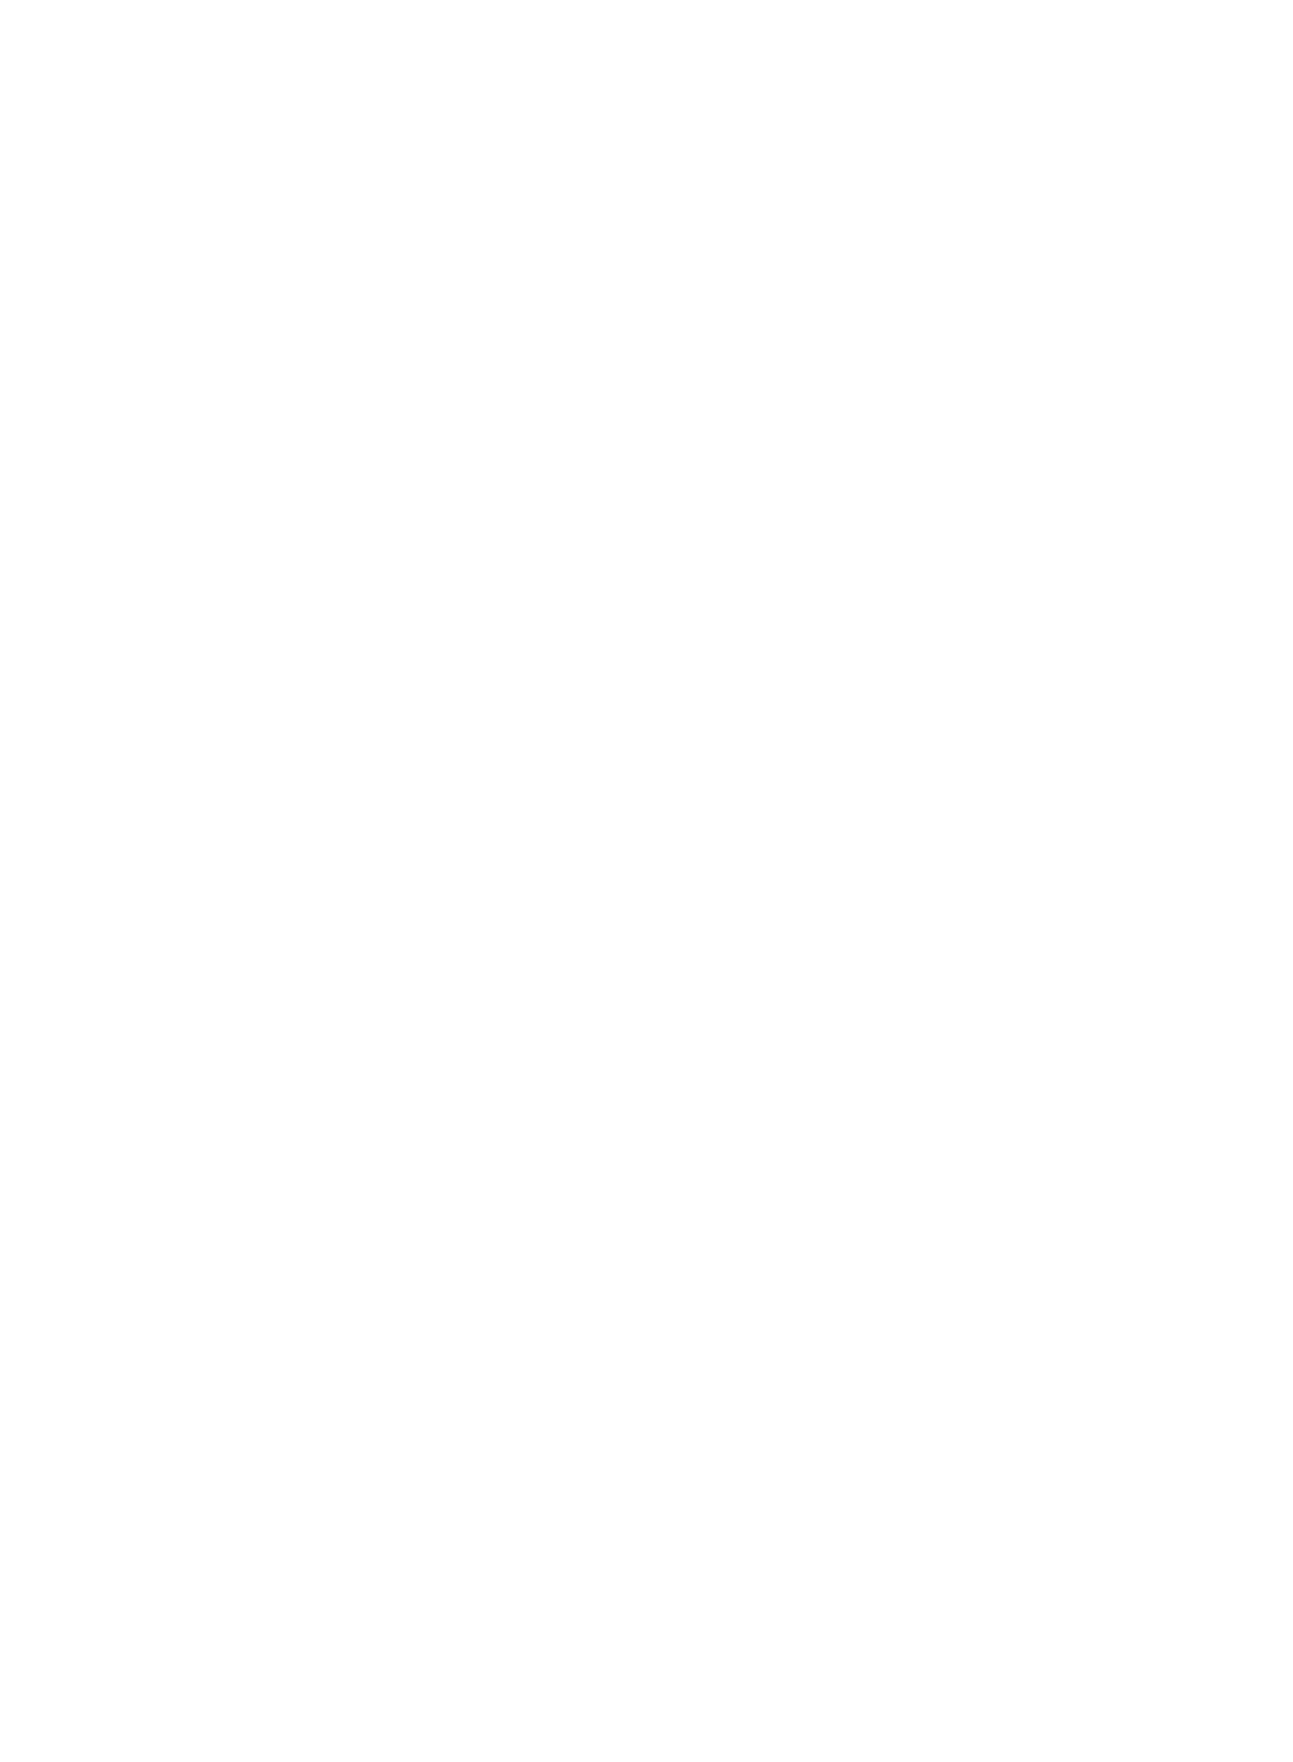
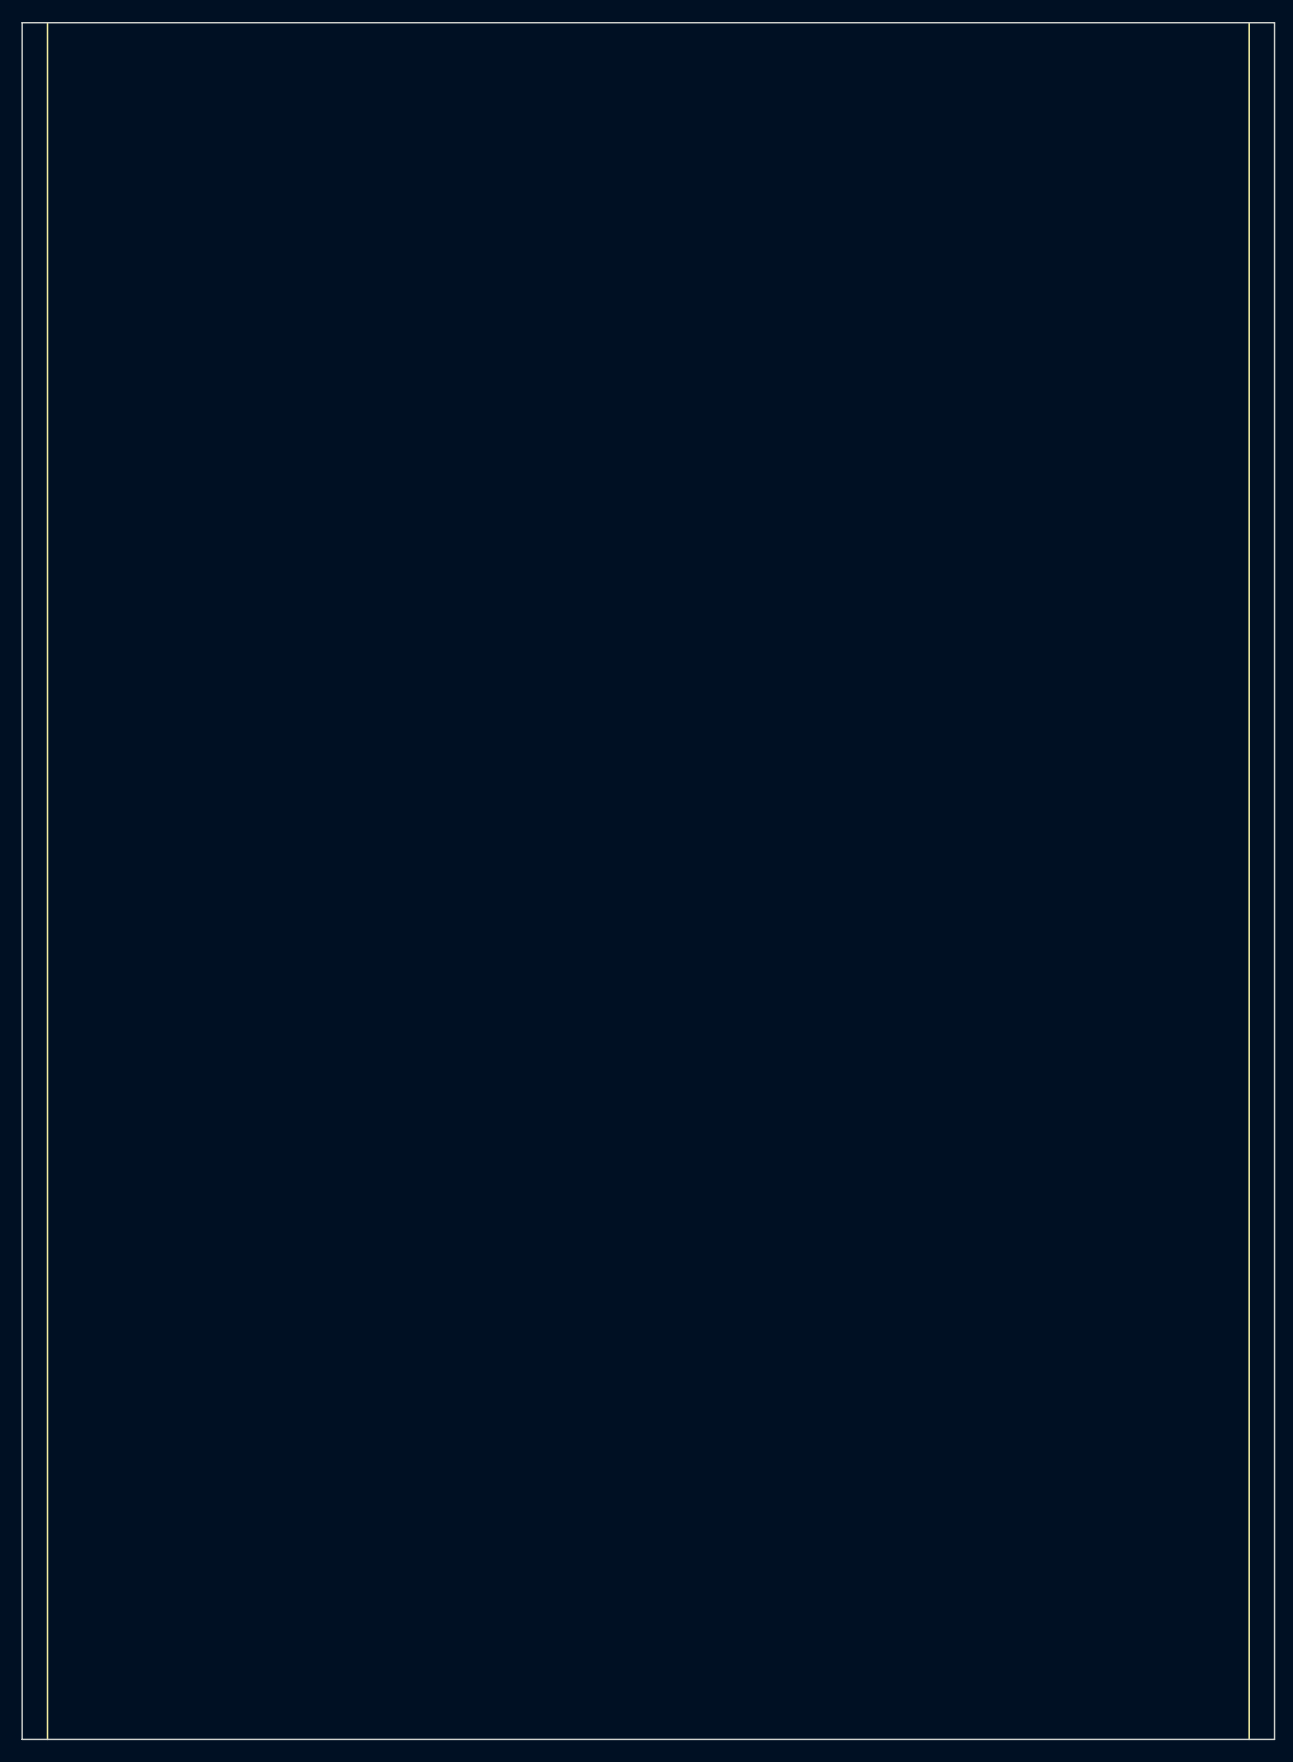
line: none -> (47, 22) (47, 1739)
line: none -> (1249, 22) (1249, 1739)
board edge: none -> (1274, 22) (1274, 1739) (22, 1739) (22, 22) (1274, 22)

